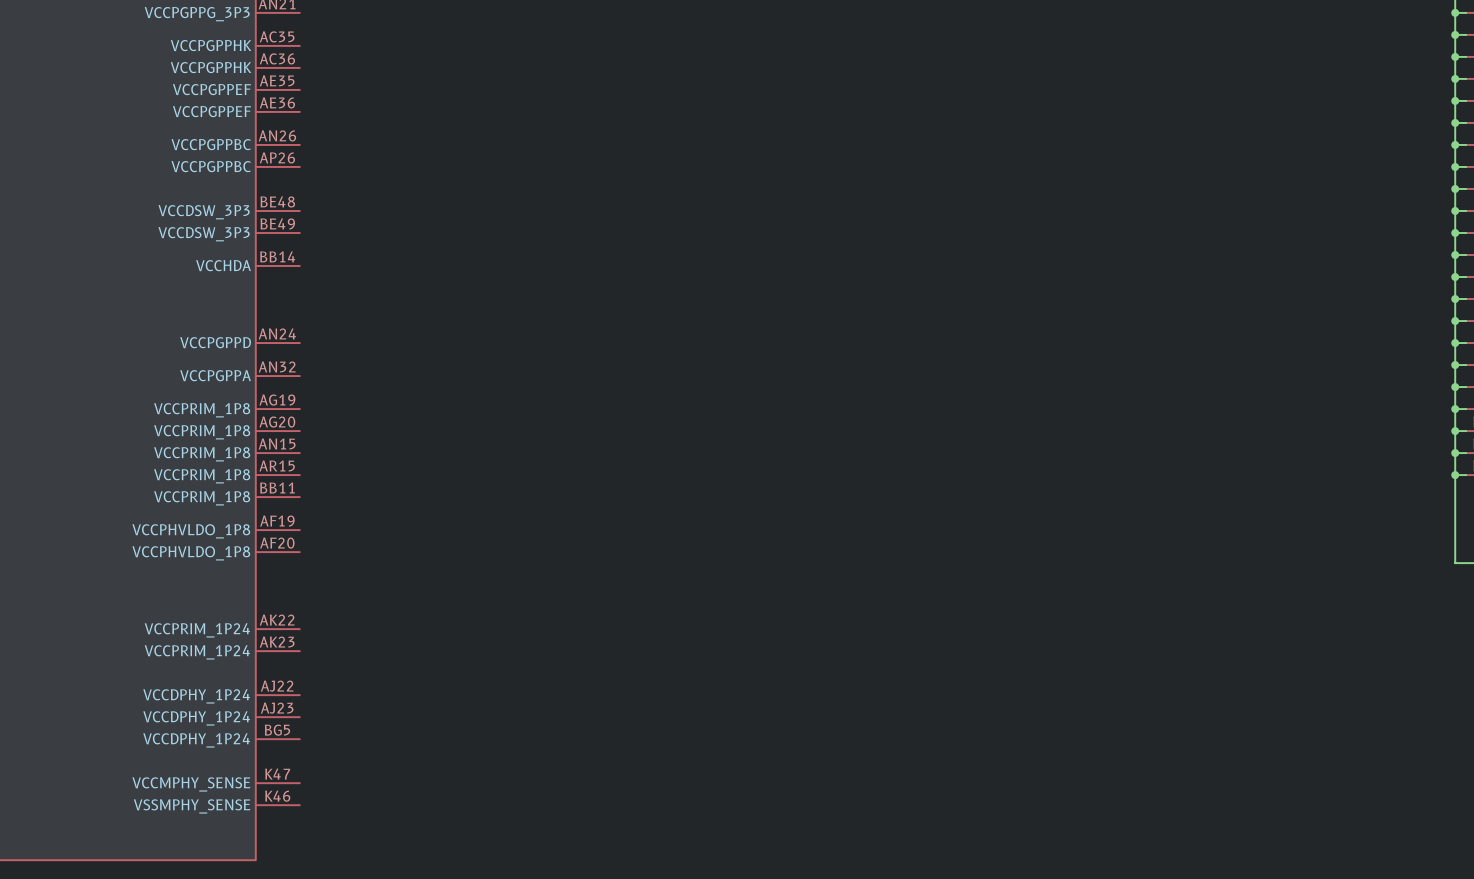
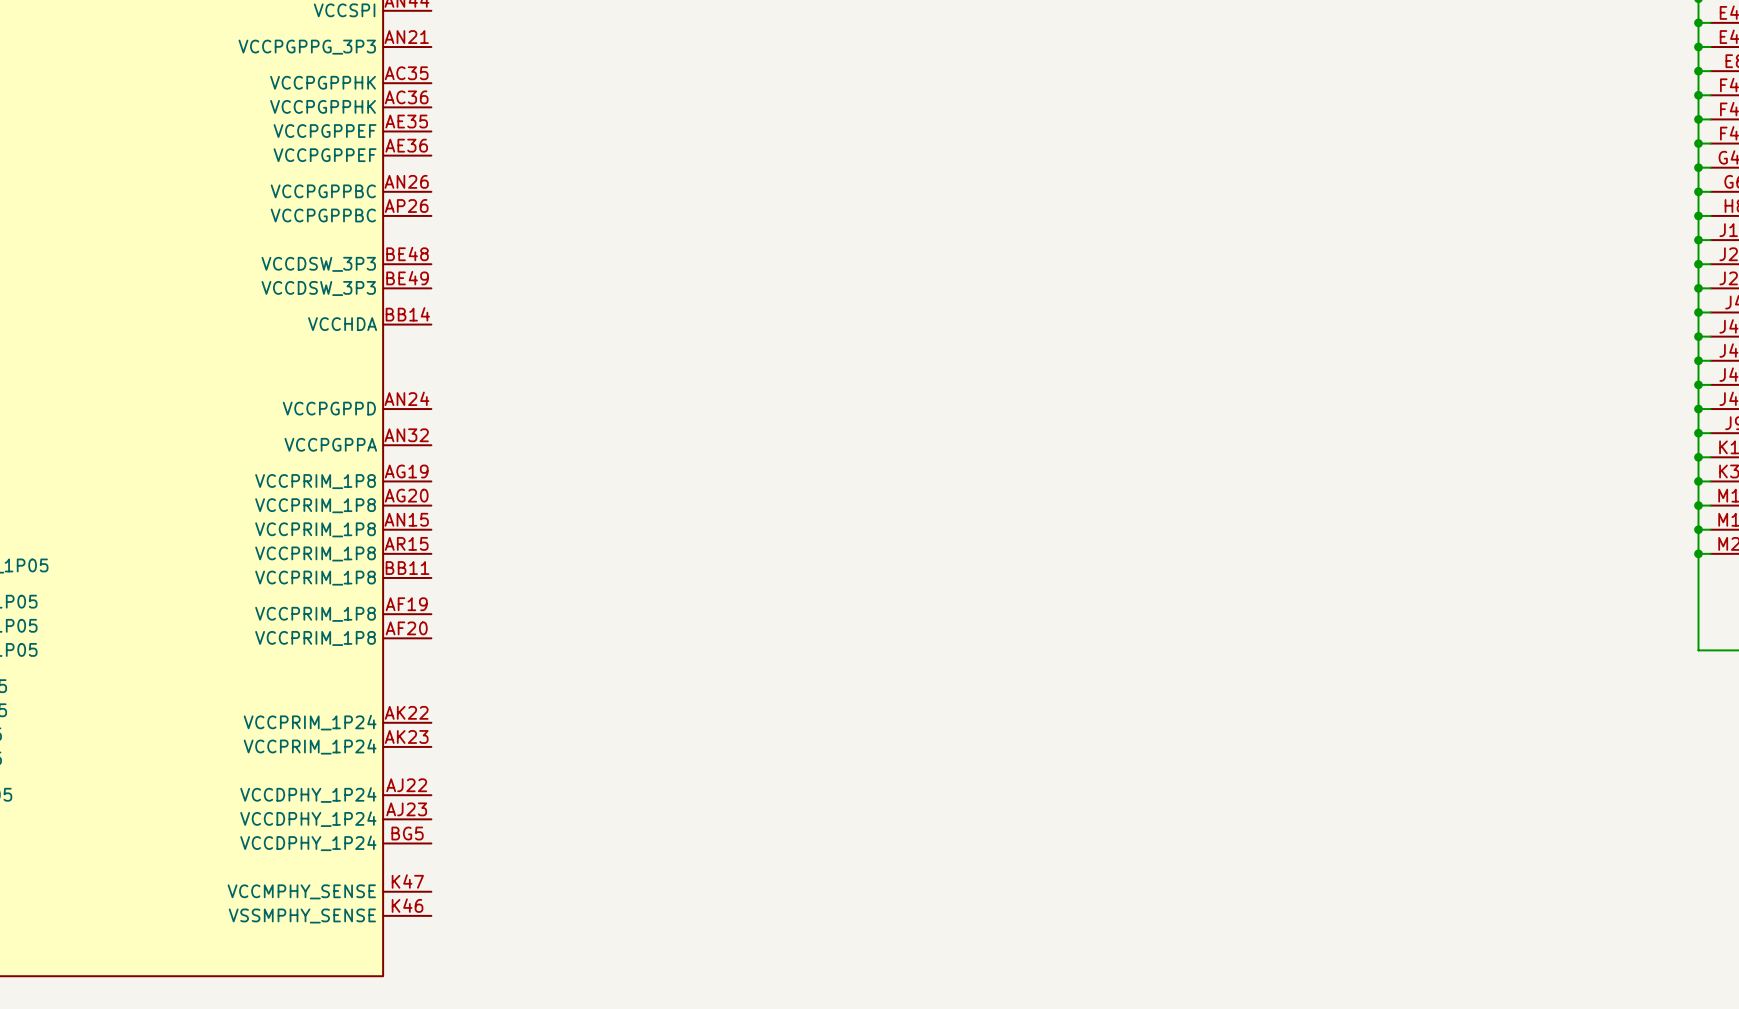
part pin name: VCCPHVLDO_1P8 (191, 531) -> VCCPRIM_1P8 (315, 614)
part pin name: VCCPHVLDO_1P8 (191, 553) -> VCCPRIM_1P8 (315, 638)

